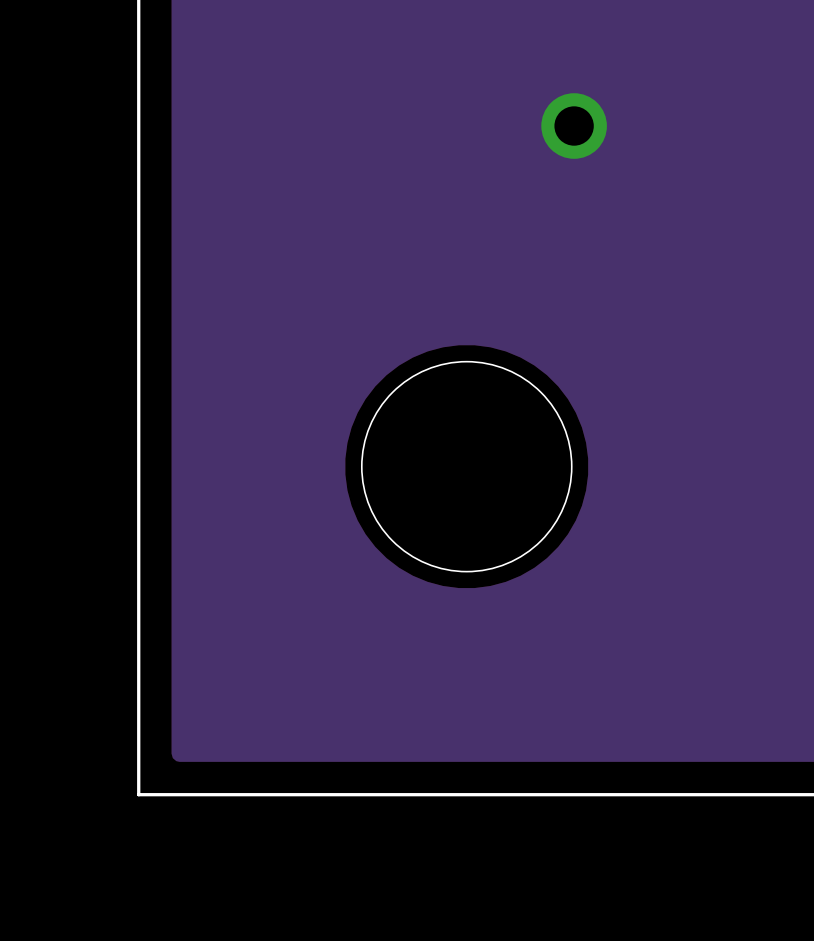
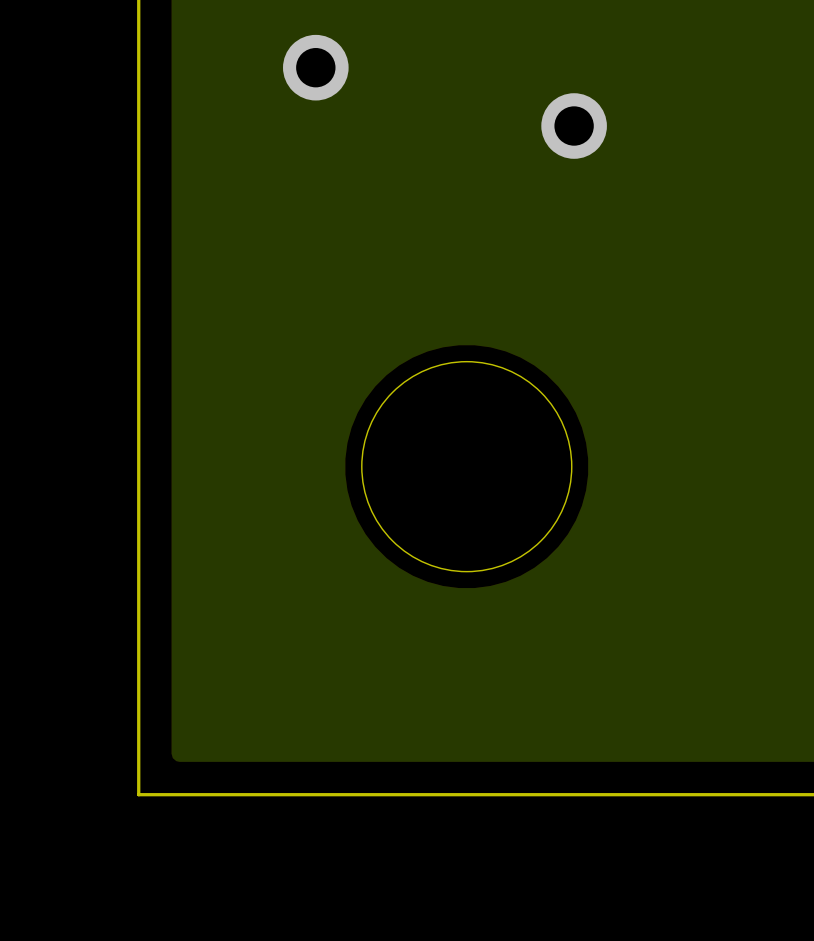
via: none -> (315, 67)

